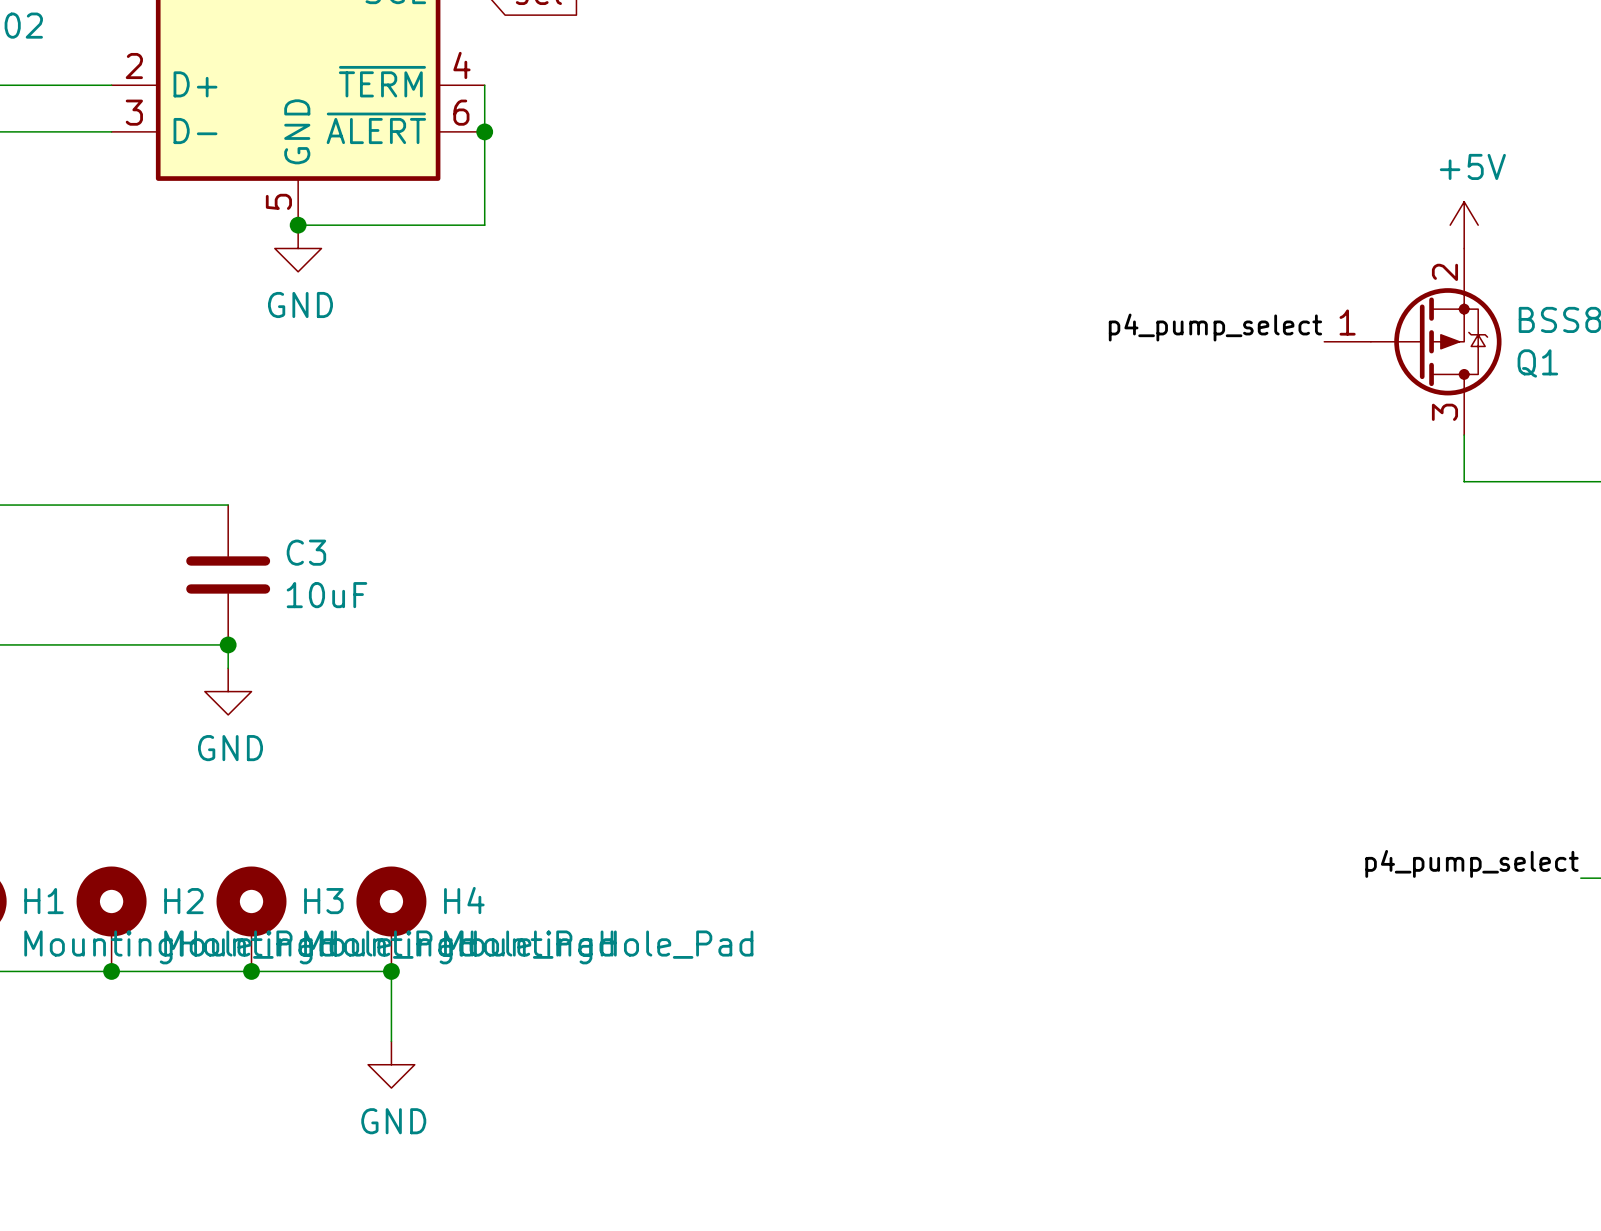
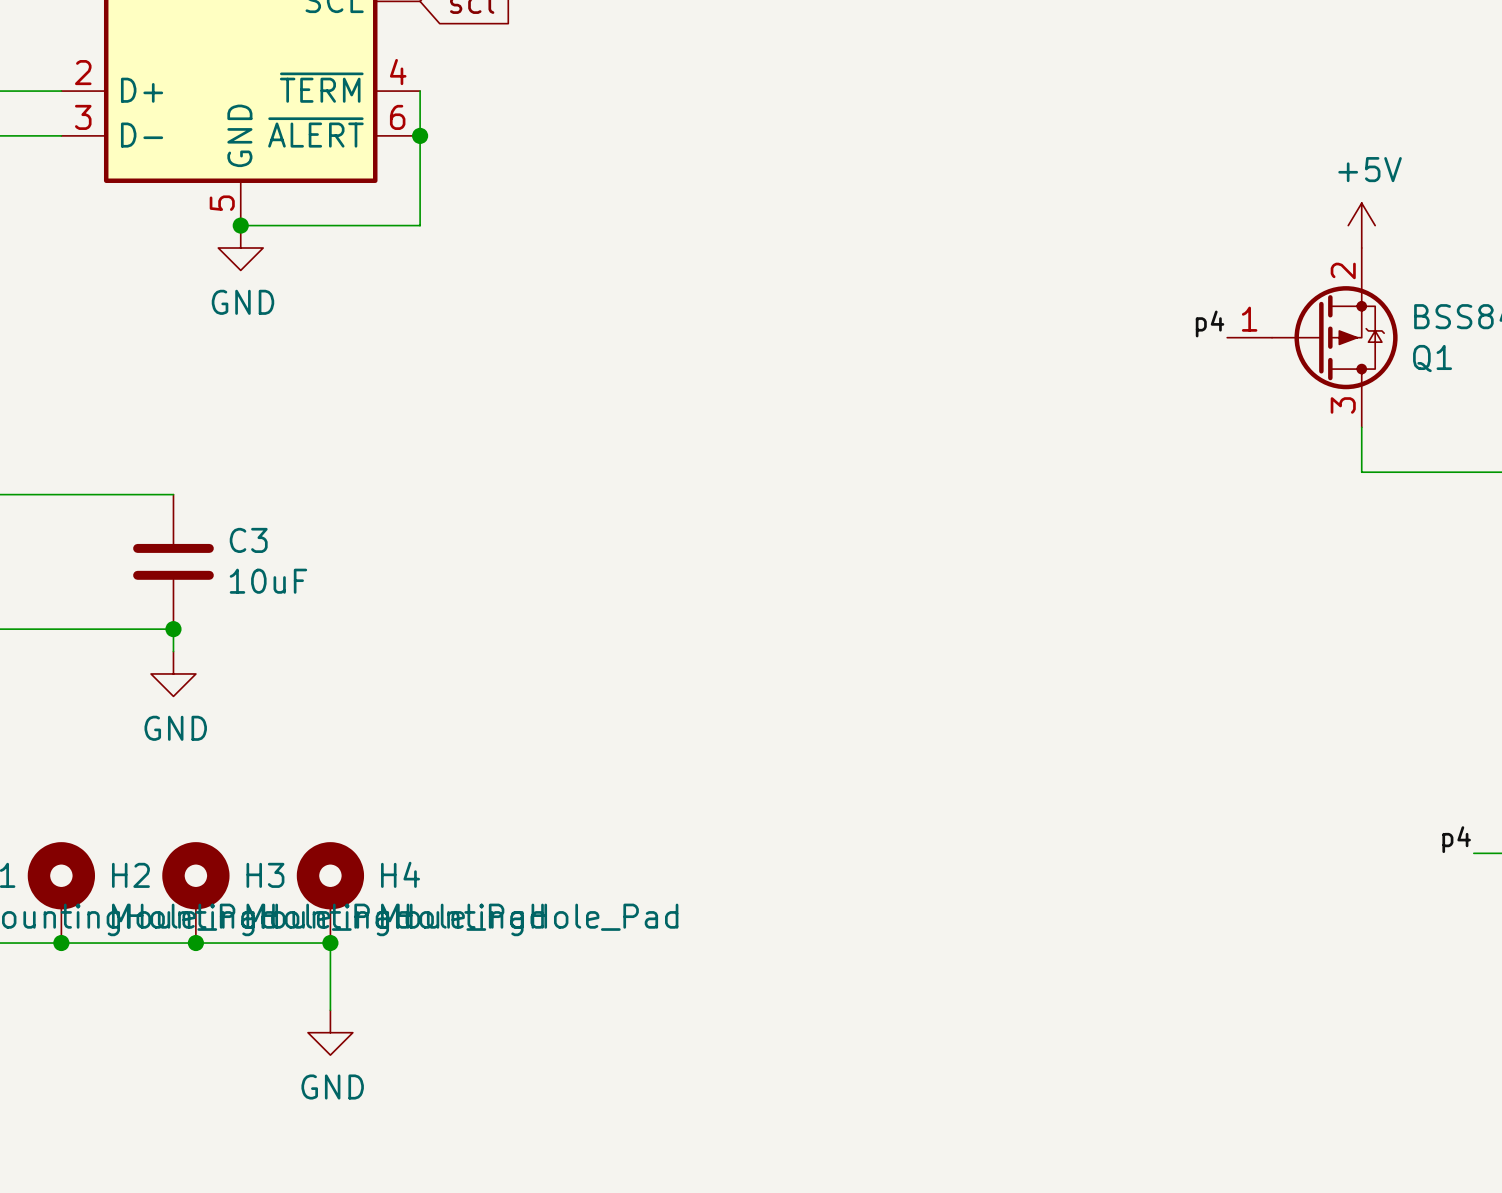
label: p4_pump_select (1215, 327) -> p4 (1210, 323)
label: p4_pump_select (1471, 863) -> p4 (1456, 839)

